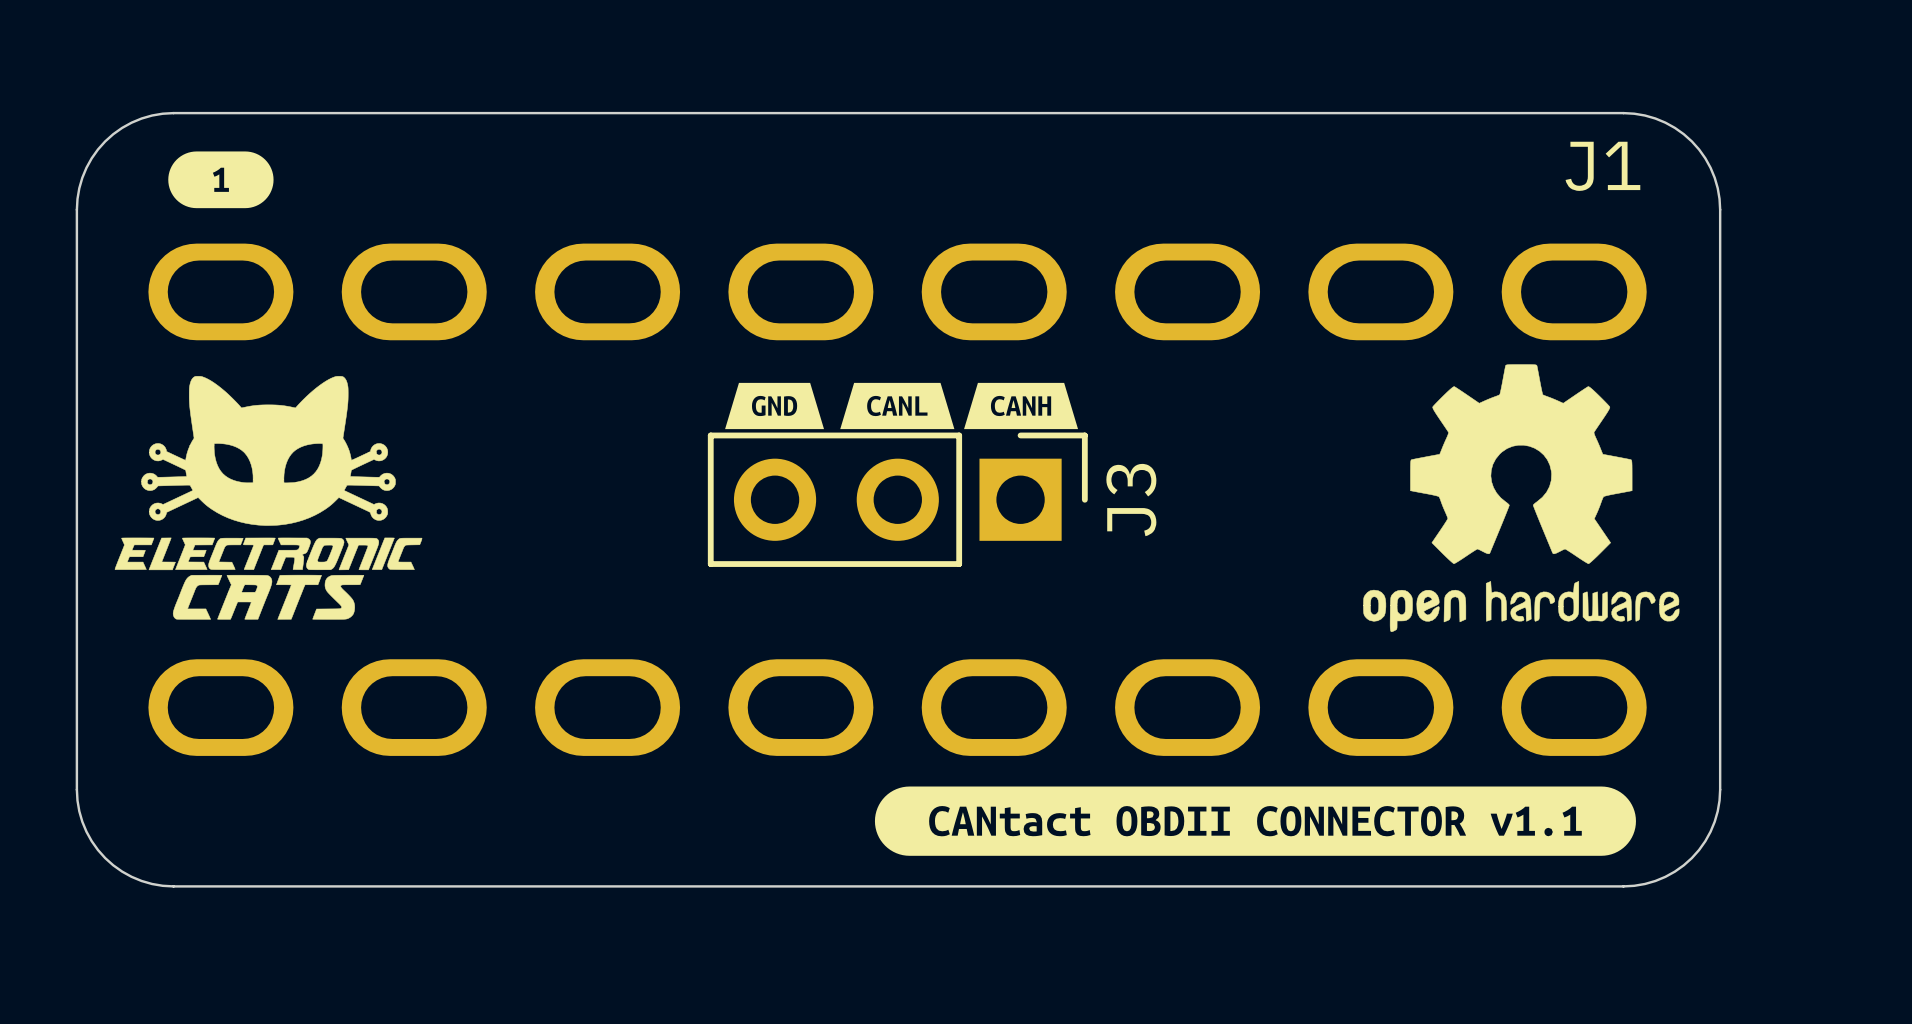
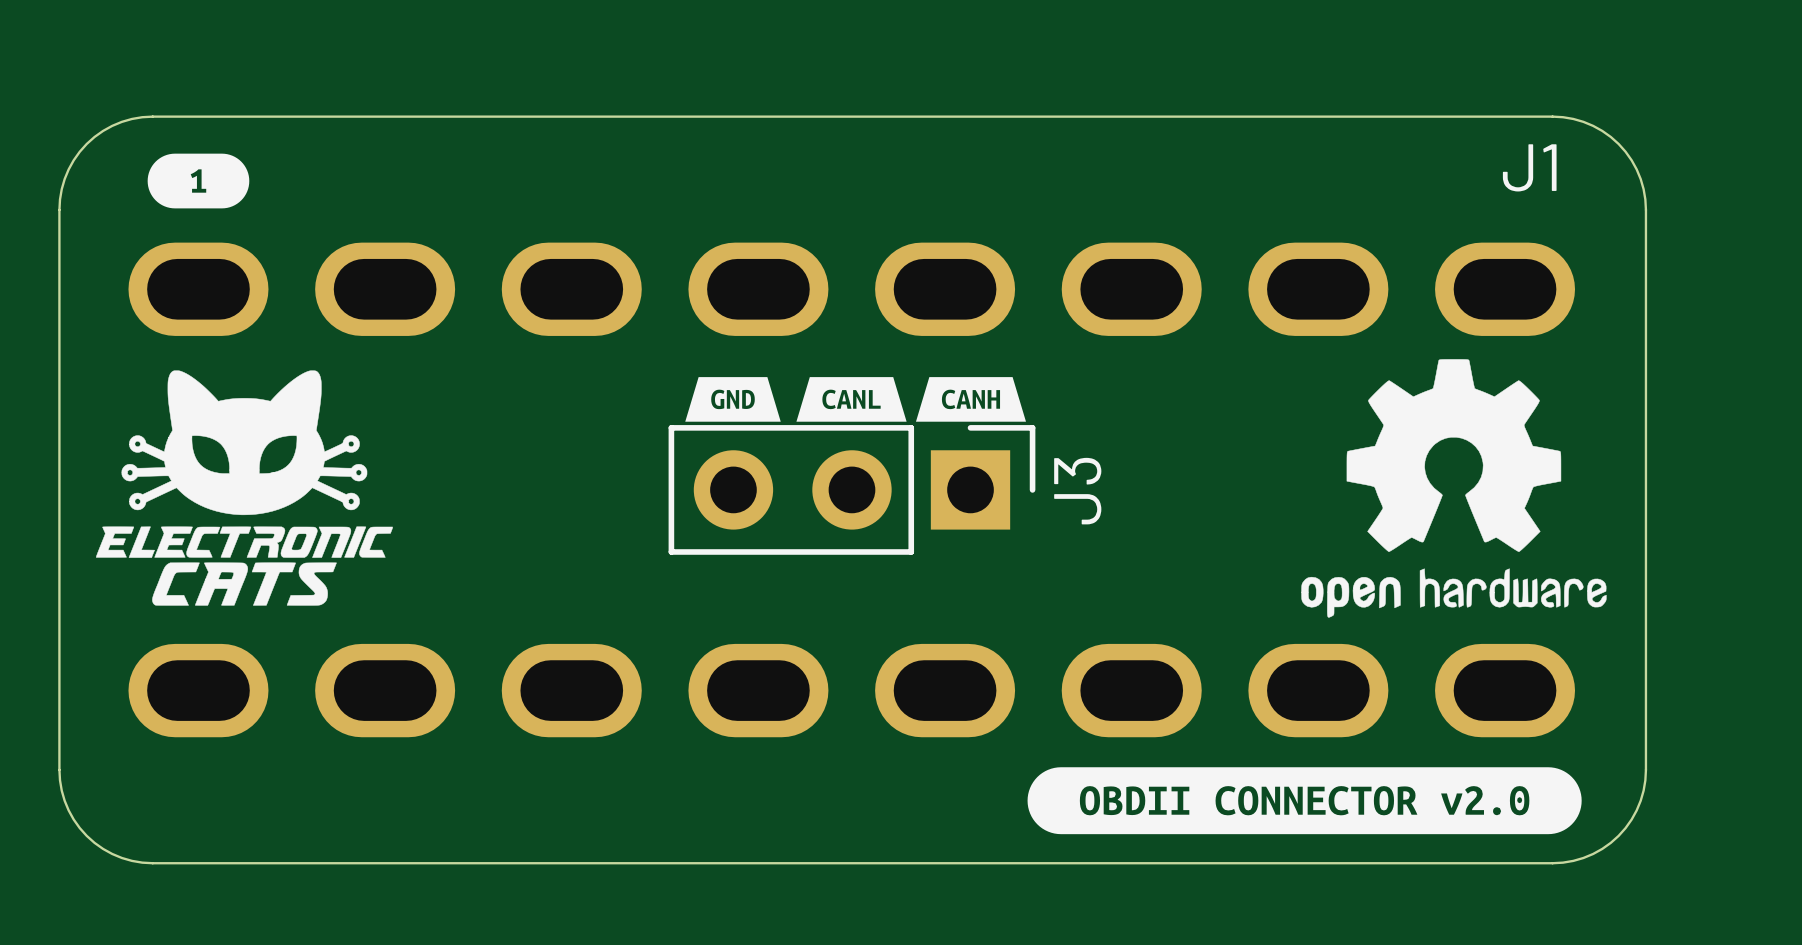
drawing: [874, 786, 1636, 856] -> none
drawing: none -> [1027, 767, 1582, 835]

